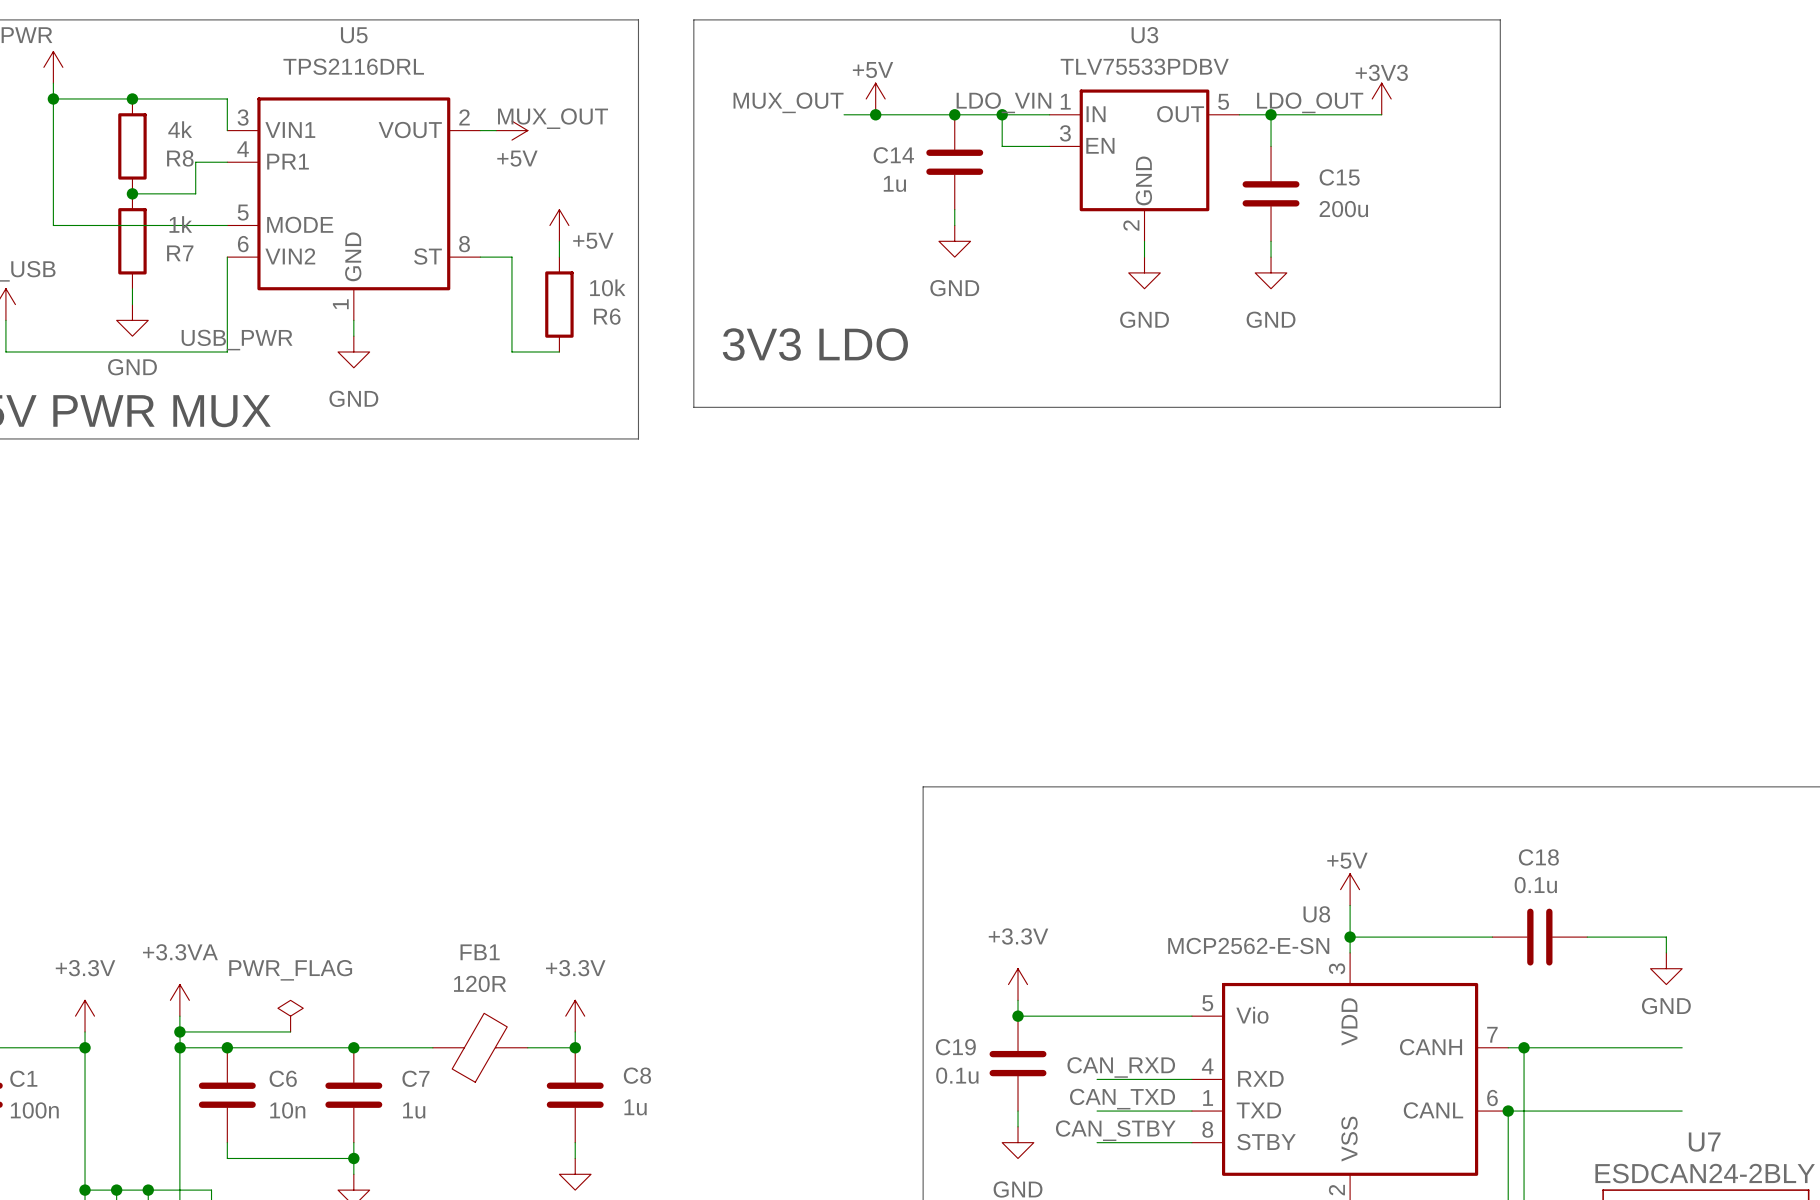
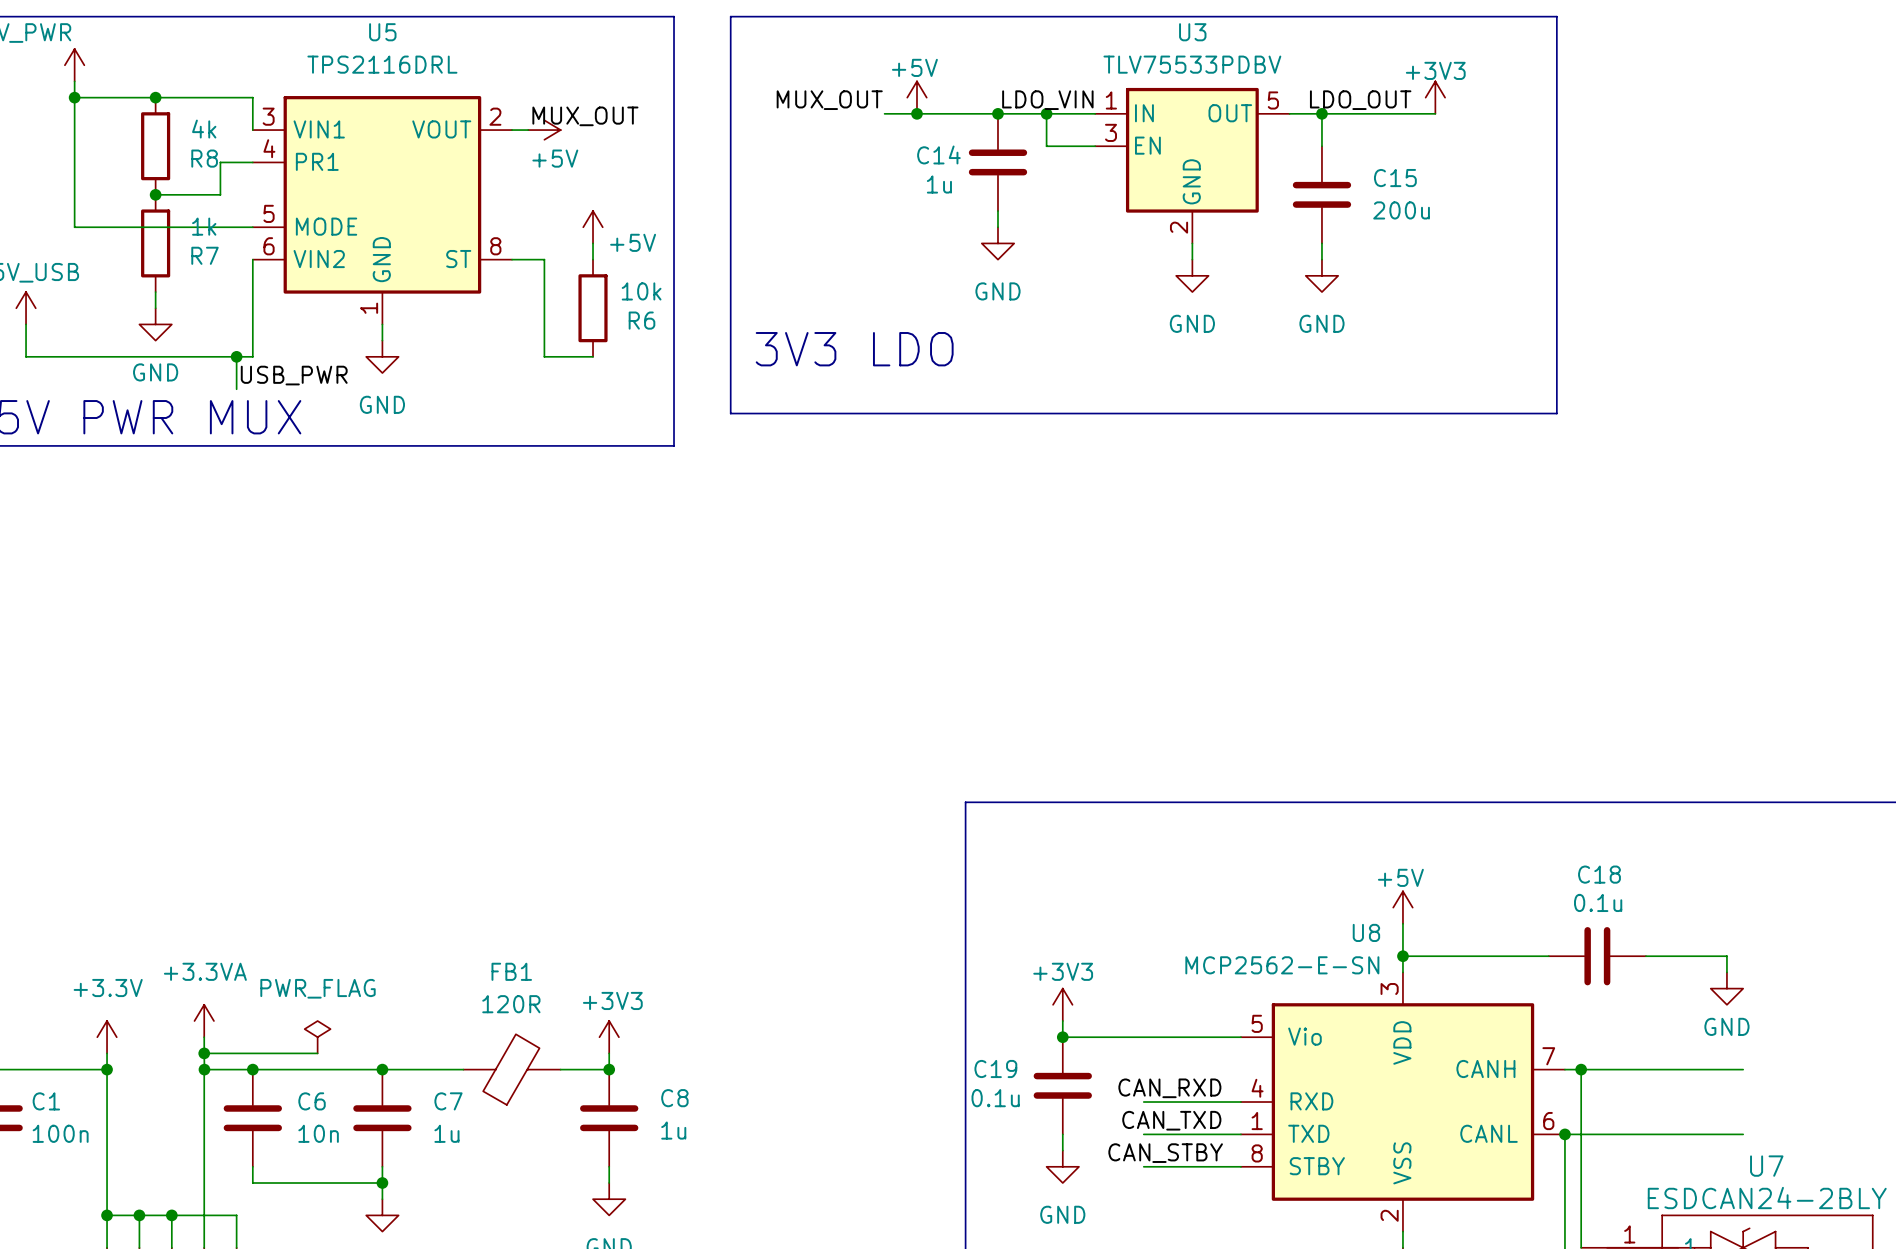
label position: USB_PWR (237, 340) -> USB_PWR (294, 375)
wire: none -> (236, 356) (236, 389)
junction: none -> (236, 356)
power symbol: +3.3V (1018, 984) -> +3V3 (1062, 1004)
power symbol: +3.3V (575, 1016) -> +3V3 (609, 1037)

